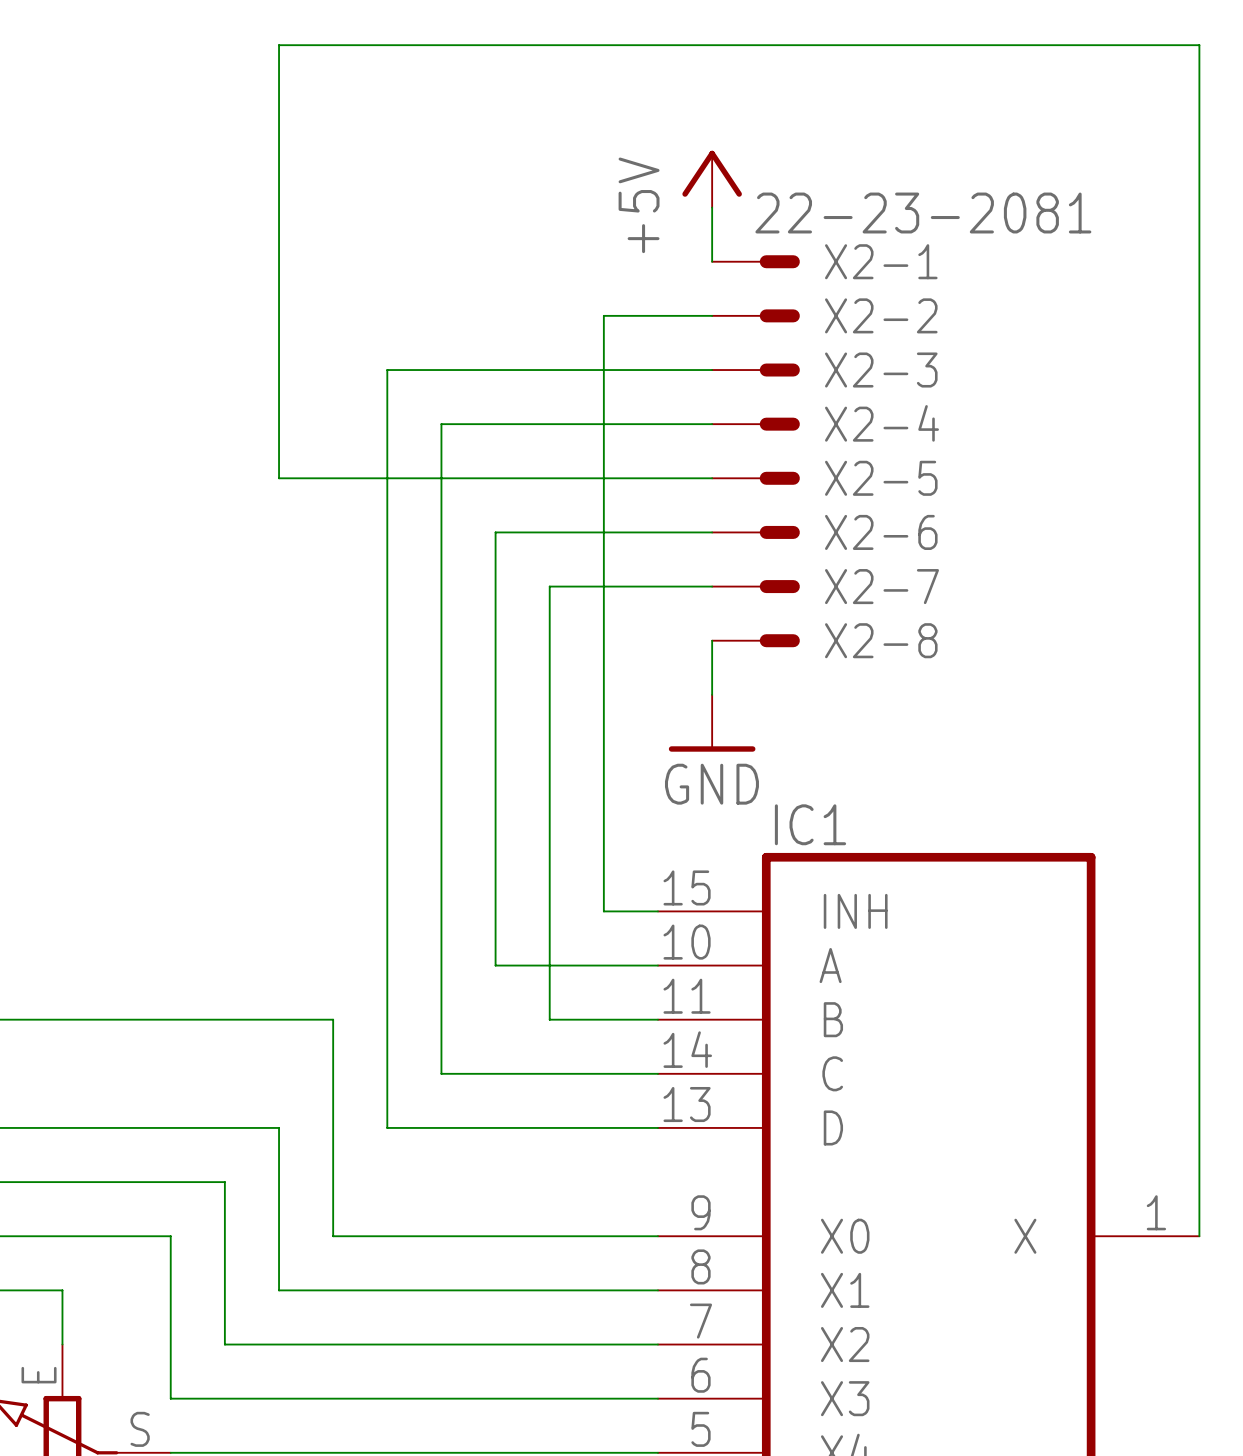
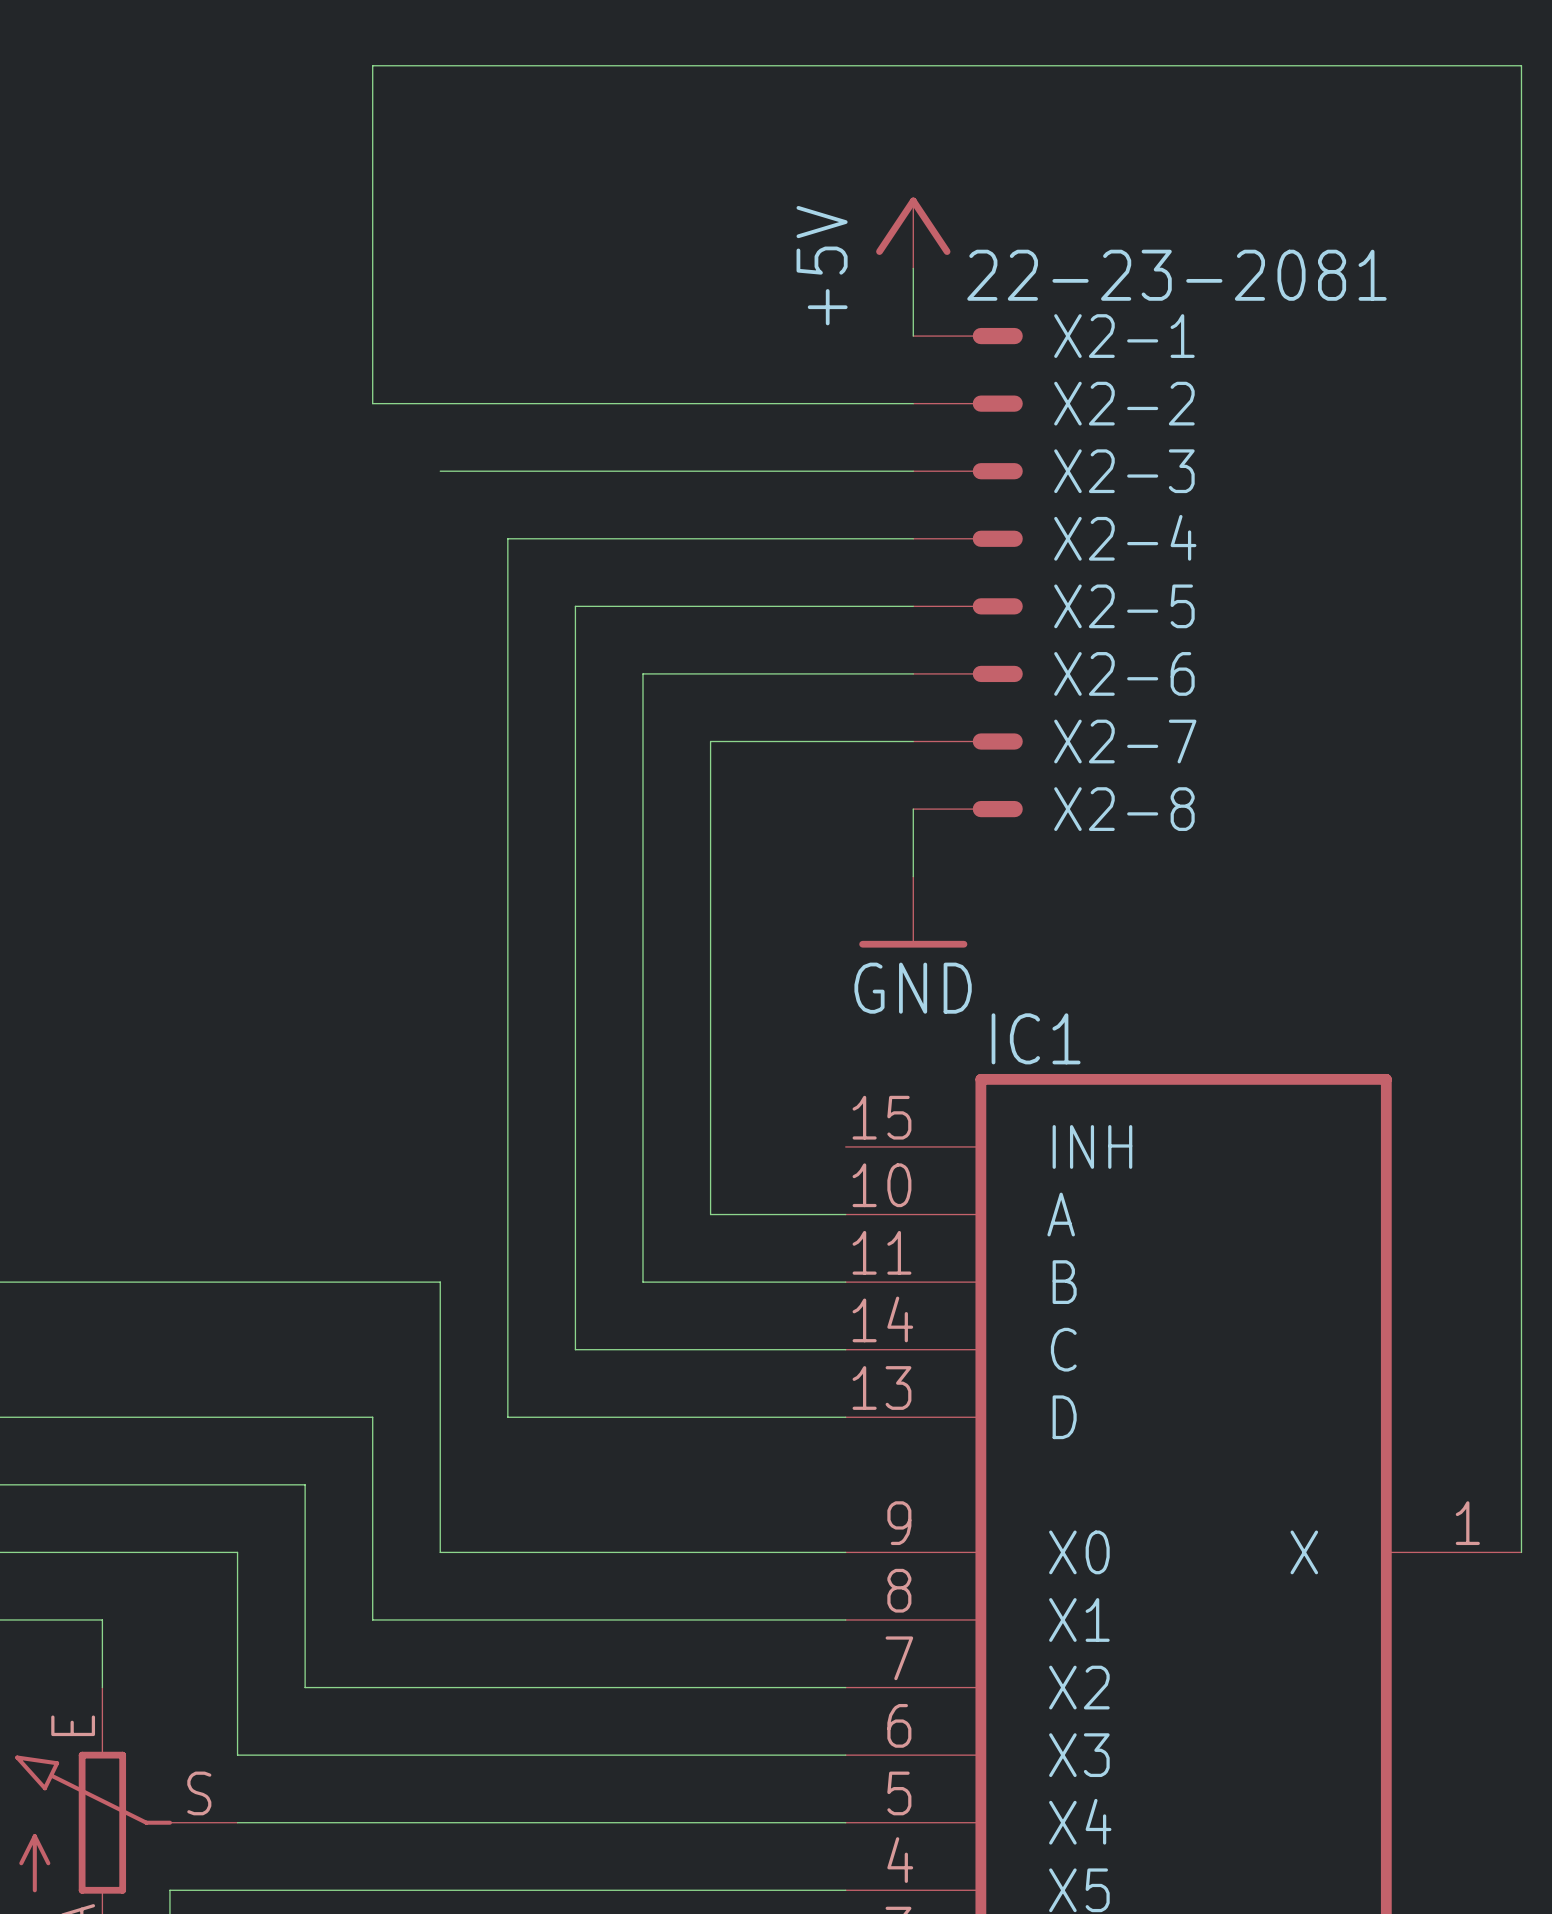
wire: (279, 315) (279, 478) (441, 478) (441, 424) -> (507, 538) (575, 538)
wire: (603, 315) (603, 911) (658, 911) -> (778, 403) (372, 403)
wire: (387, 370) (387, 424) -> (507, 471) (440, 471)
wire: (495, 965) (549, 965) (549, 1019) -> (642, 1214) (642, 1282) (710, 1282)

